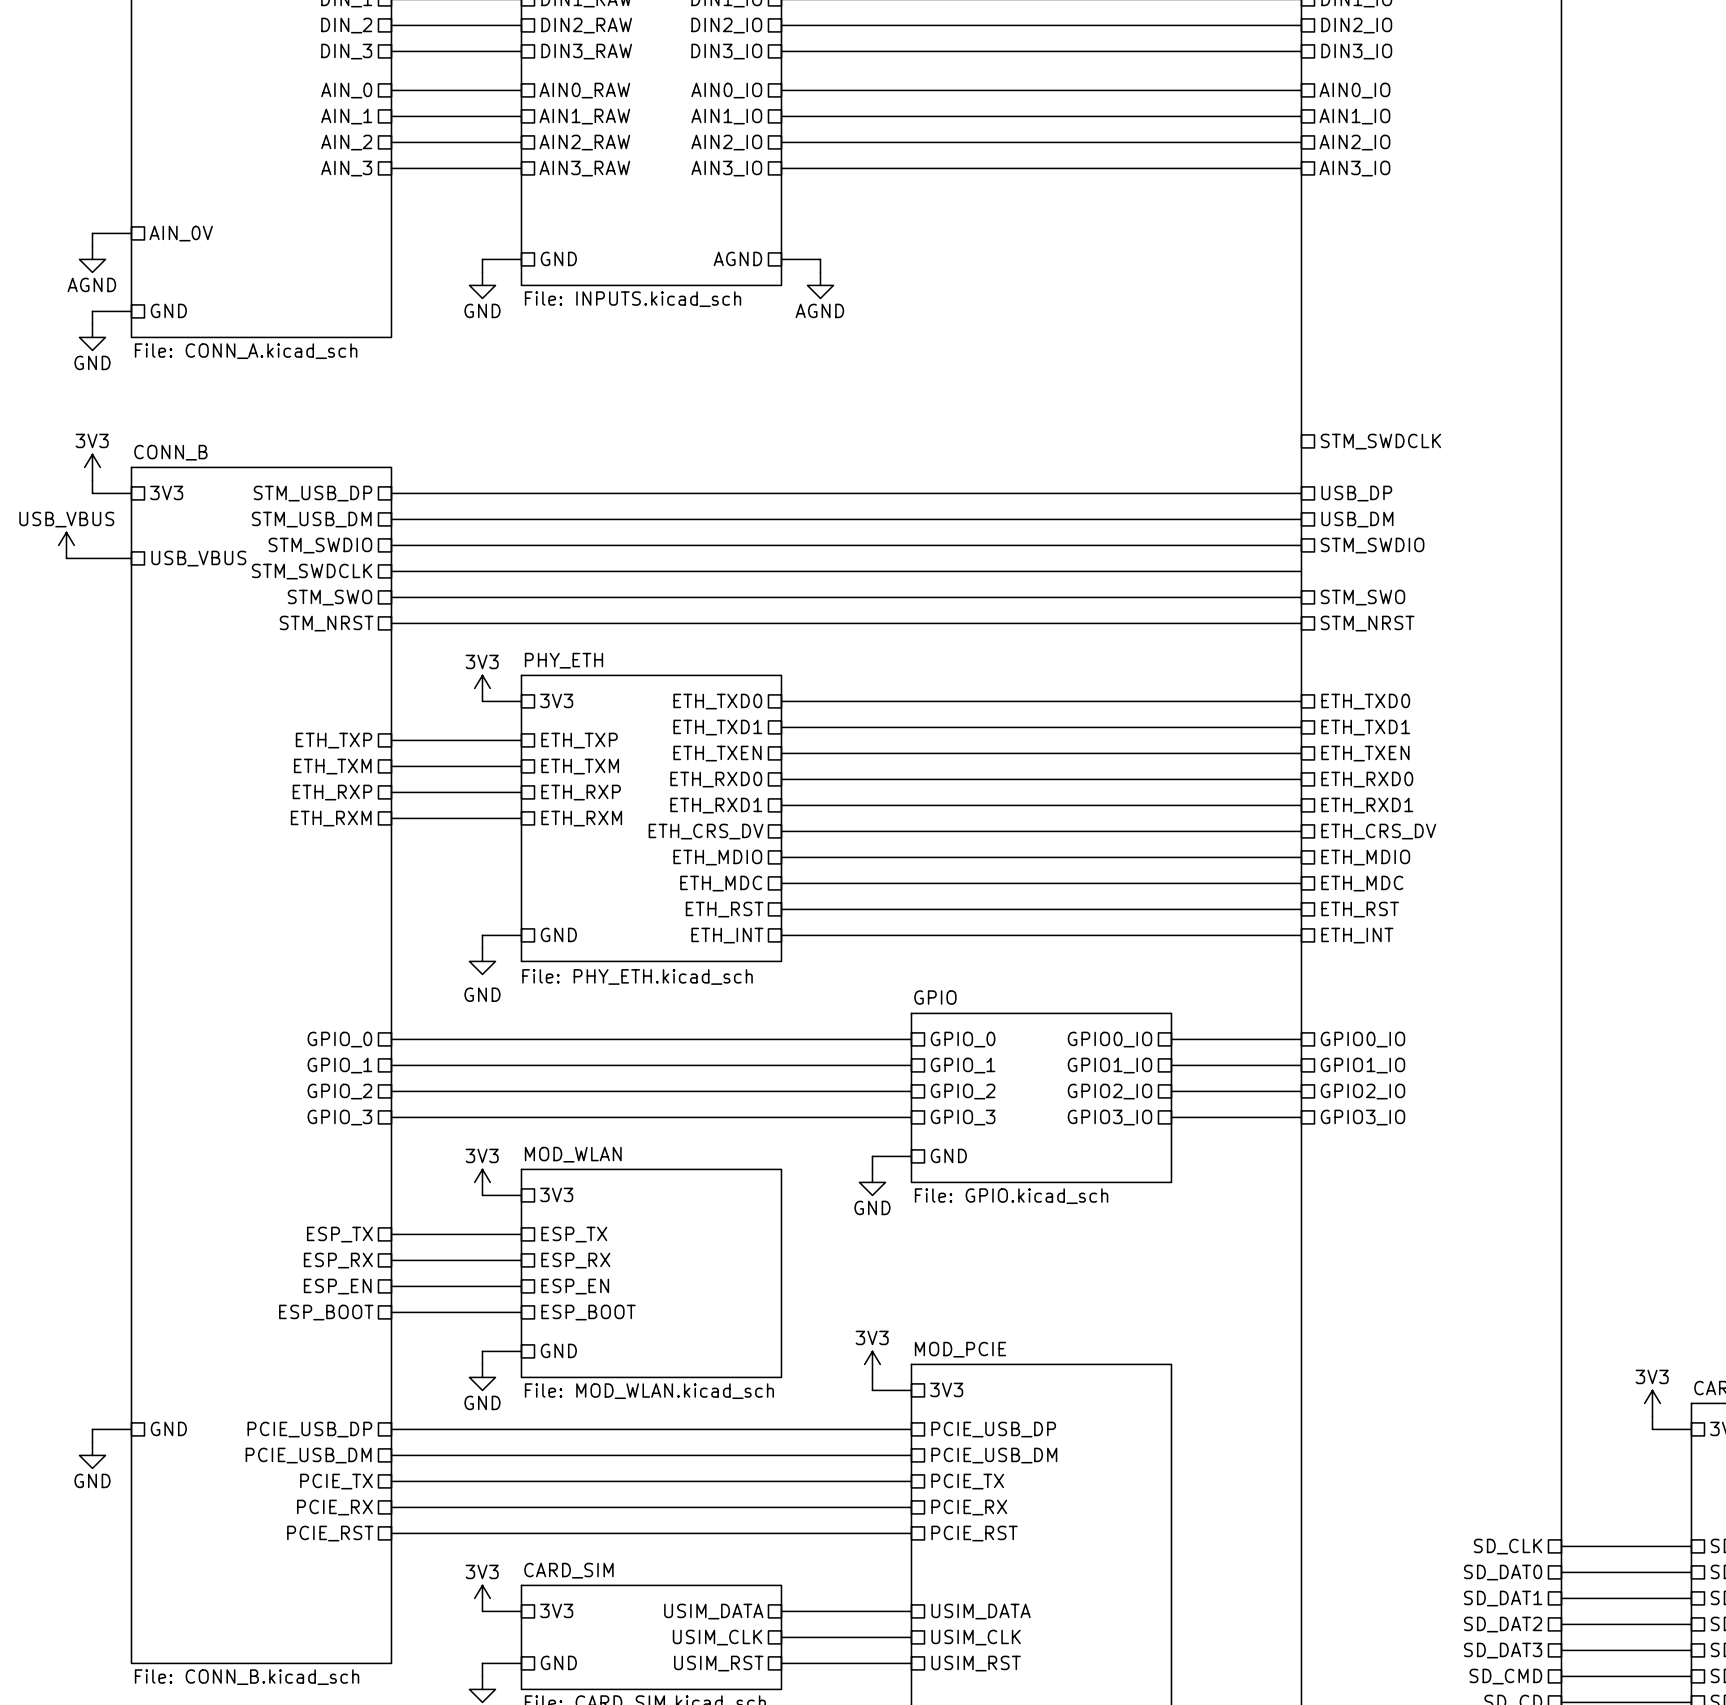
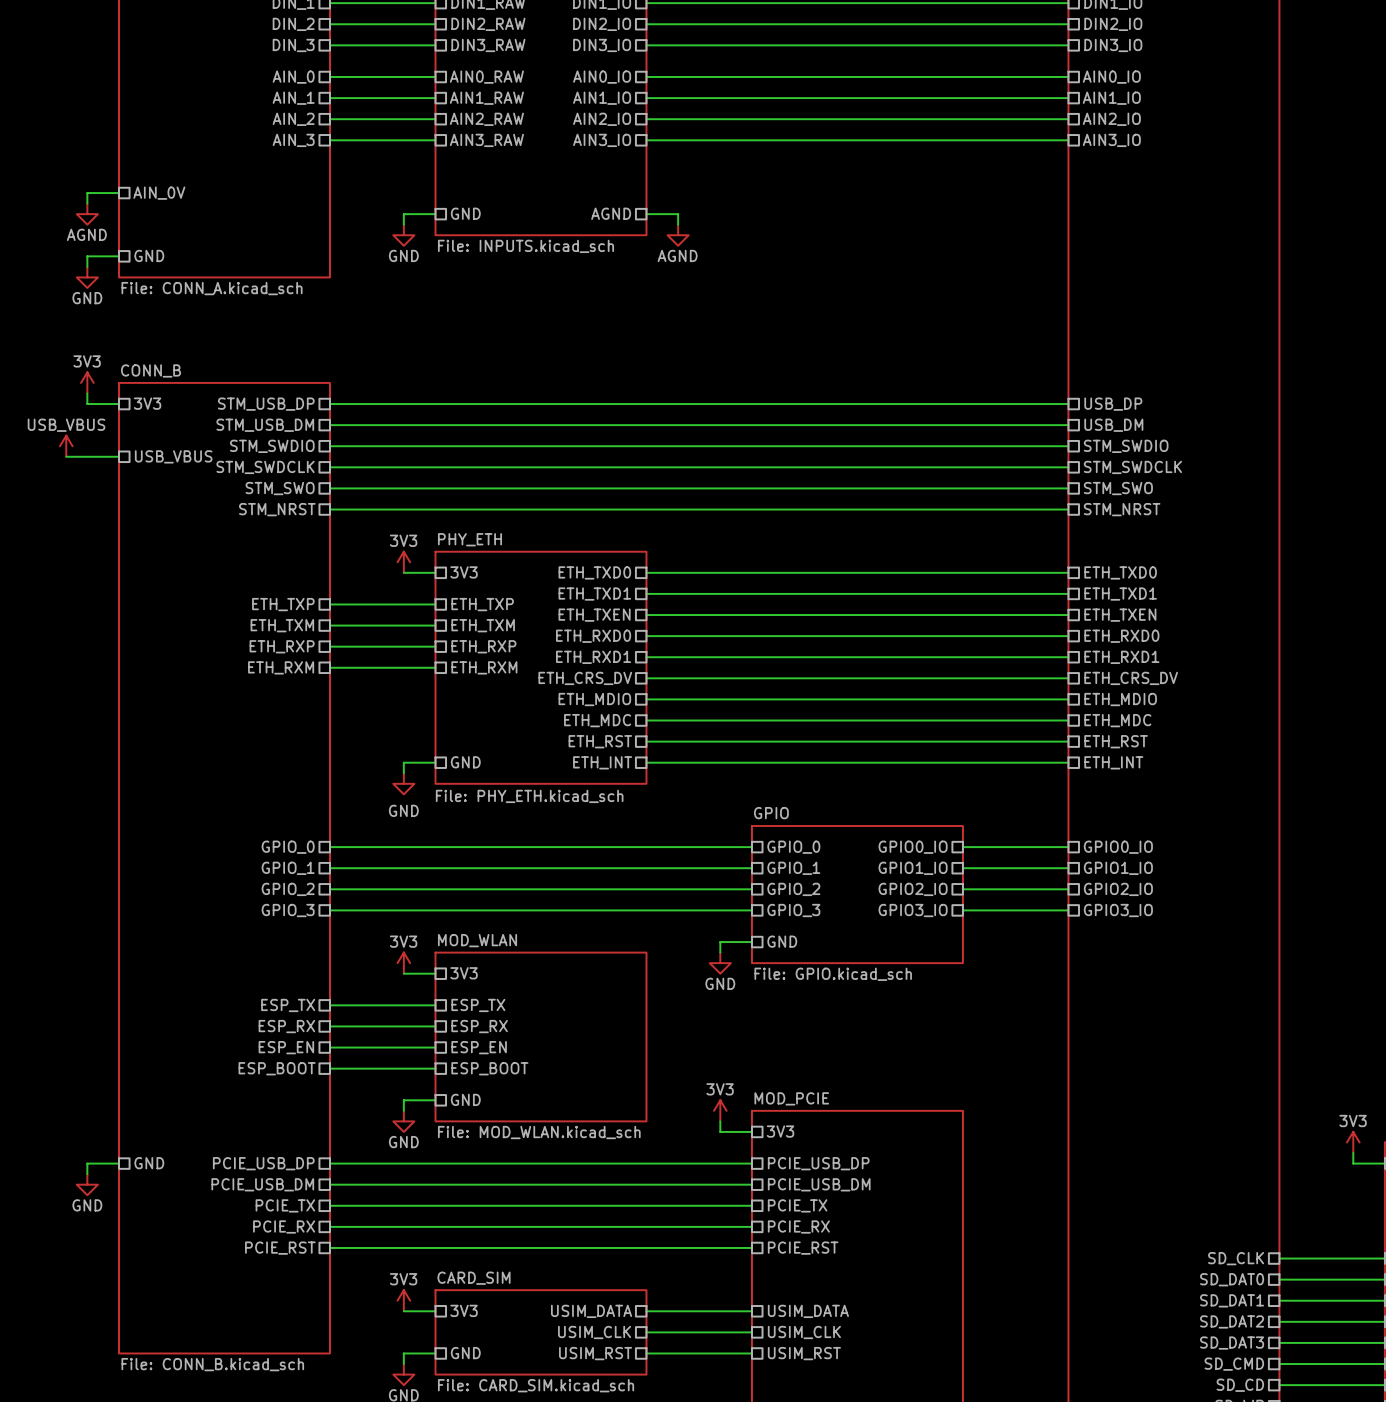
sheet pin position: STM_SWDCLK (1380, 441) -> STM_SWDCLK (1132, 467)

